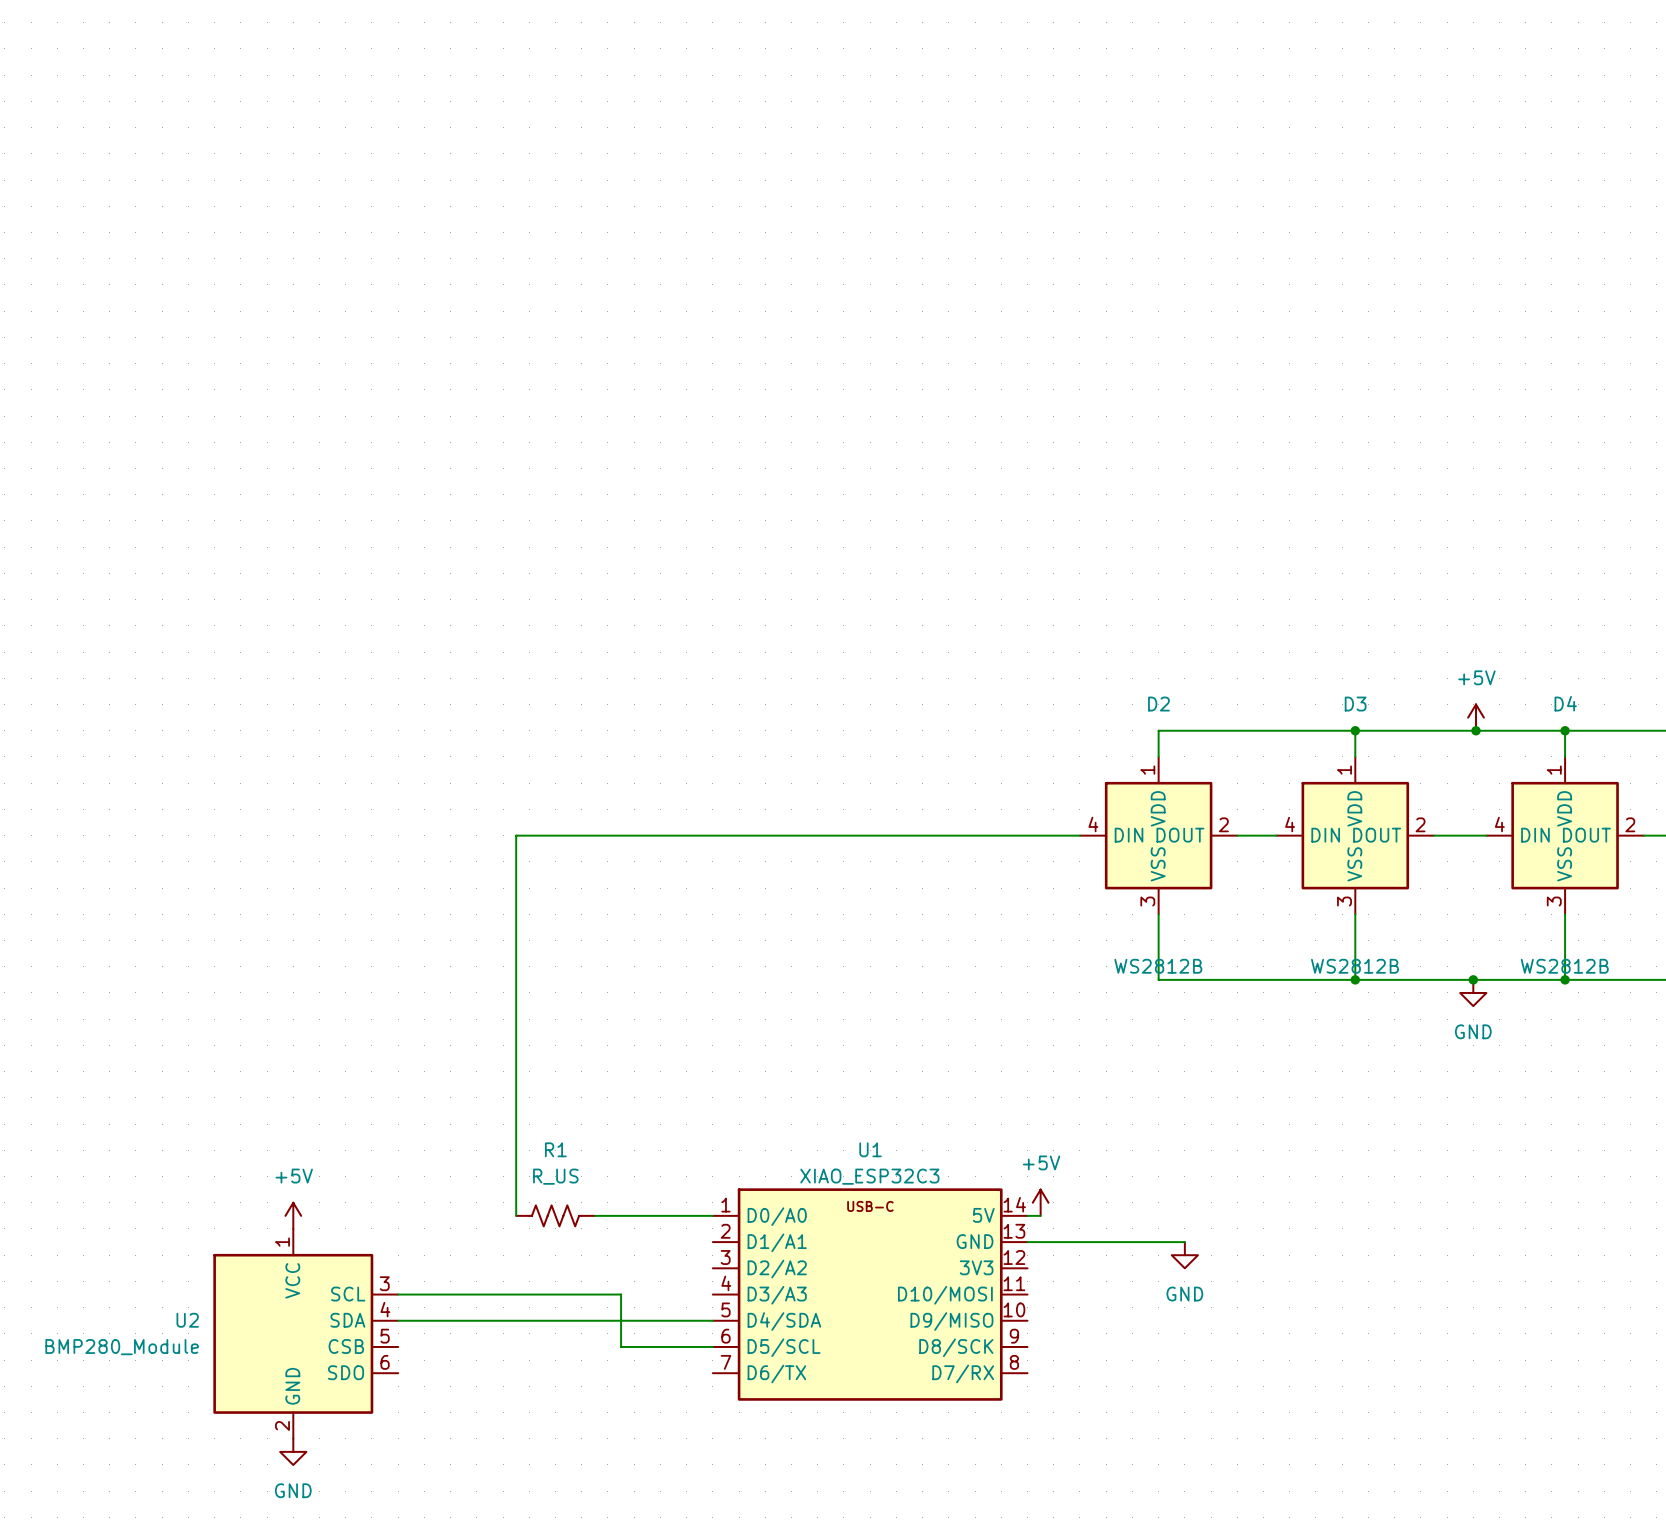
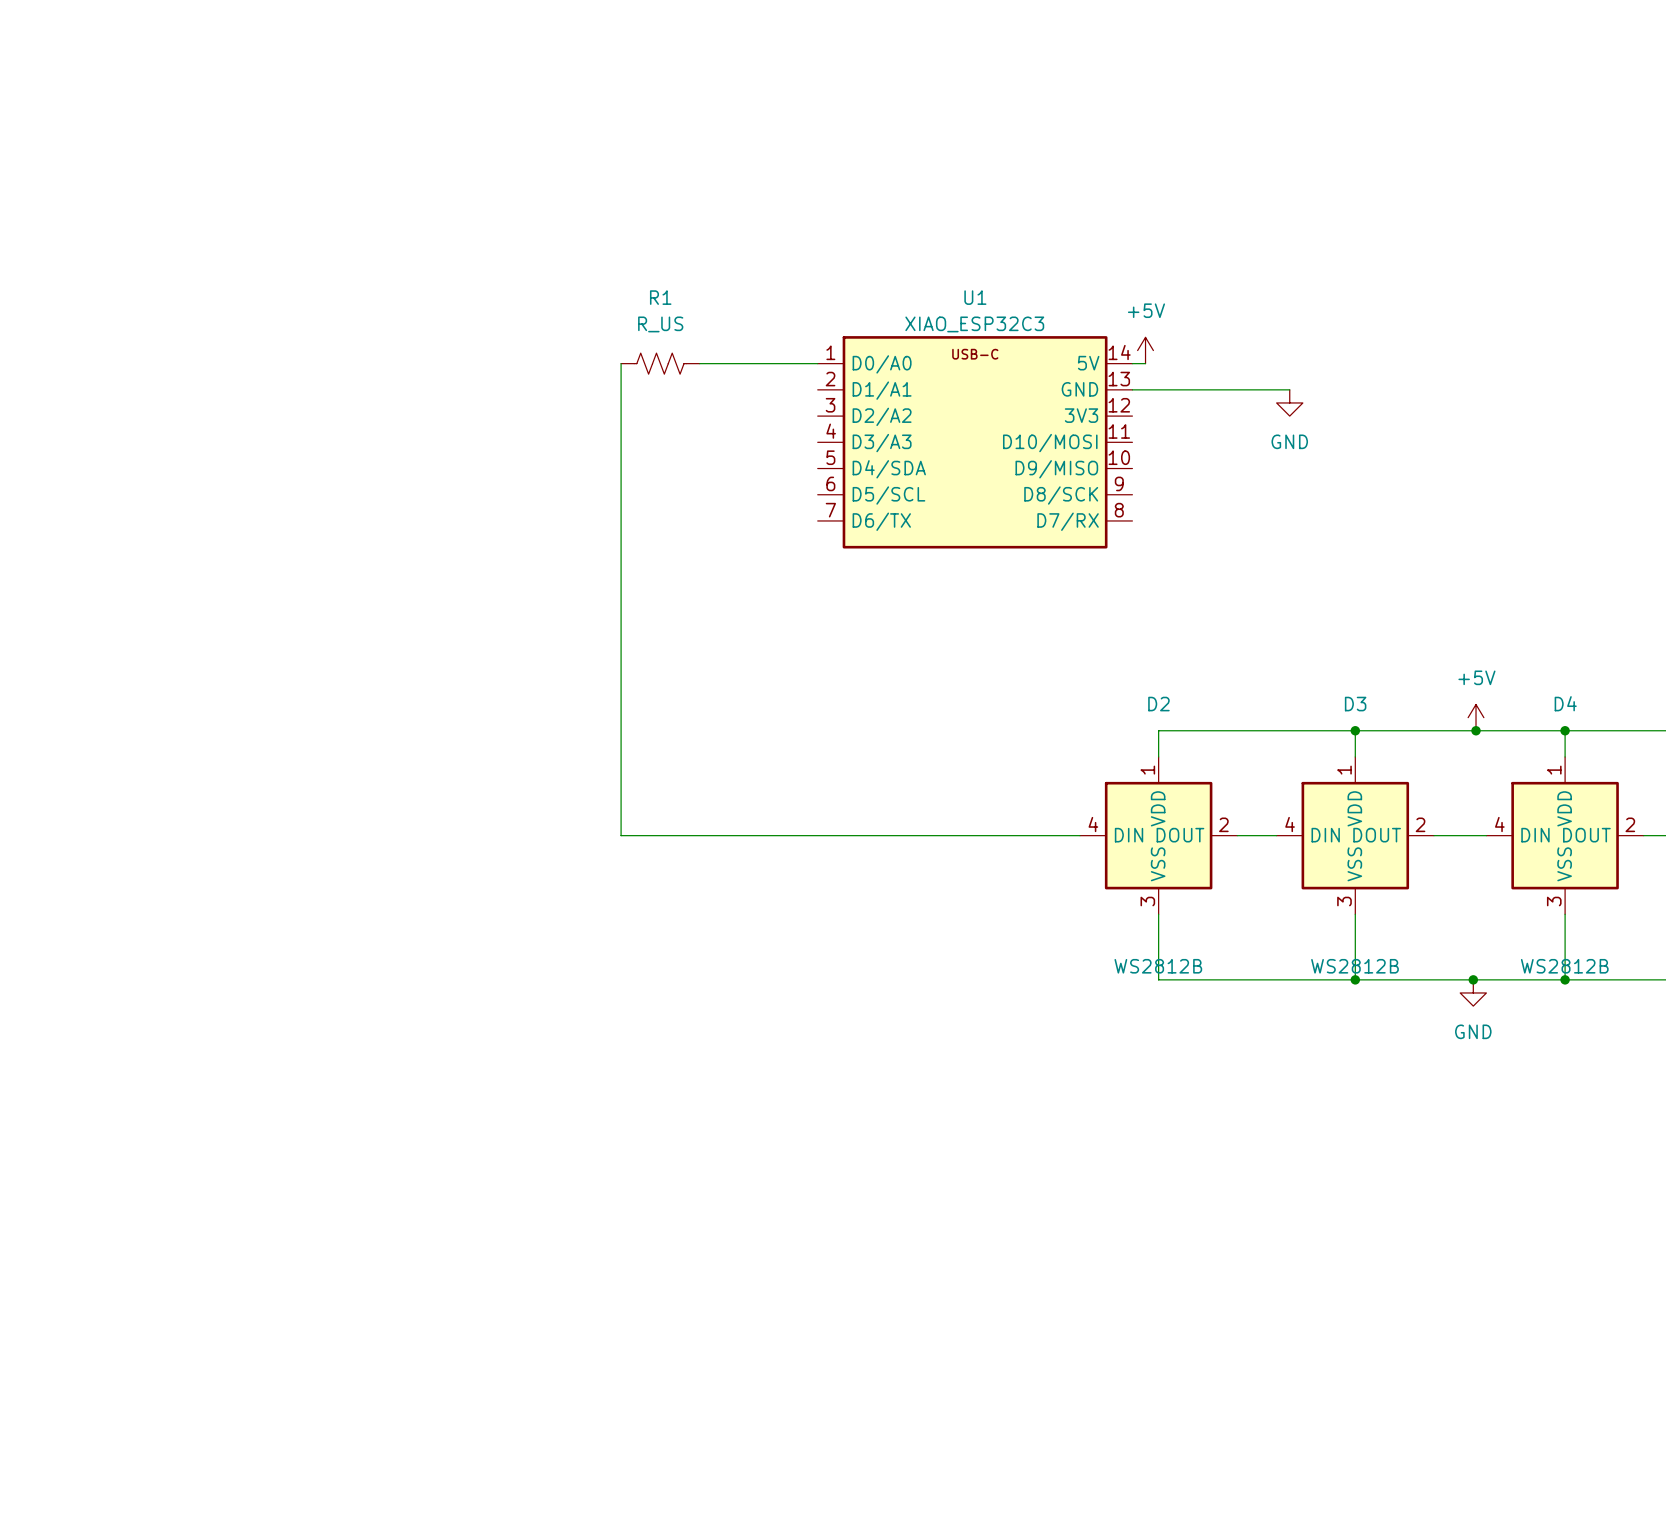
power symbol: none -> +5V (1145, 350)
wire: none -> (699, 363) (817, 363)
wire: none -> (1132, 363) (1145, 363)
wire: none -> (1132, 389) (1289, 389)
power symbol: none -> GND (1289, 402)
wire: (621, 835) (516, 835) (516, 1215) -> (621, 835) (621, 363)
power symbol: +5V (1040, 1202) -> none
power symbol: +5V (293, 1215) -> none
R1 position: (555, 1215) -> (660, 363)
wire: (594, 1215) (712, 1215) -> none
wire: (1027, 1215) (1040, 1215) -> none
wire: (1027, 1242) (1184, 1242) -> none
power symbol: GND (1184, 1255) -> none
wire: (398, 1294) (621, 1294) (621, 1346) (712, 1346) -> none
U1 position: (870, 1294) -> (975, 442)
wire: (398, 1320) (712, 1320) -> none
U2: BMP280_Module (305, 1333) -> none
power symbol: GND (293, 1451) -> none

